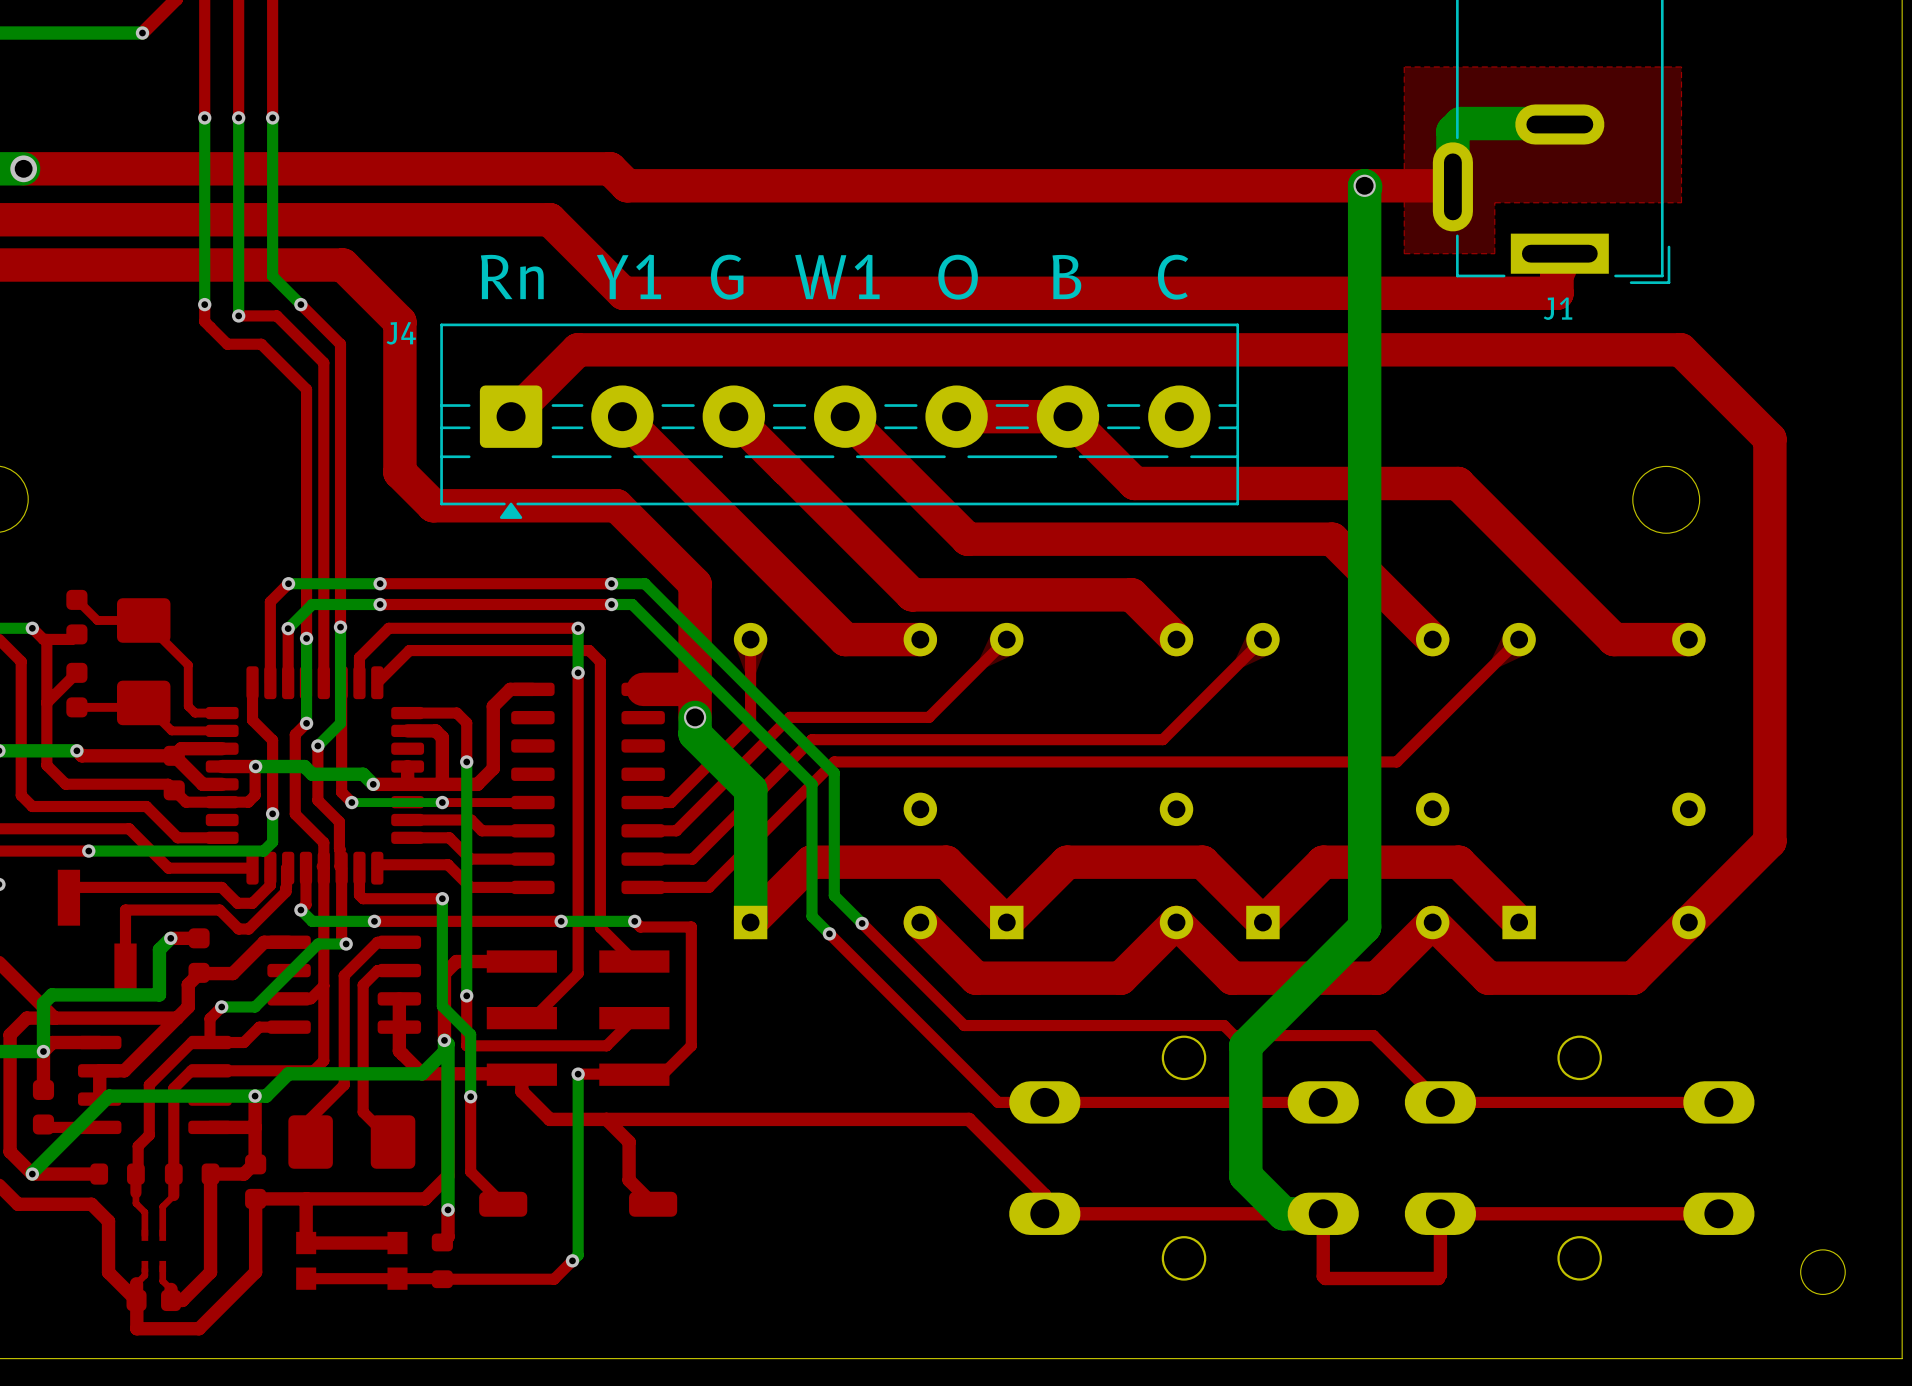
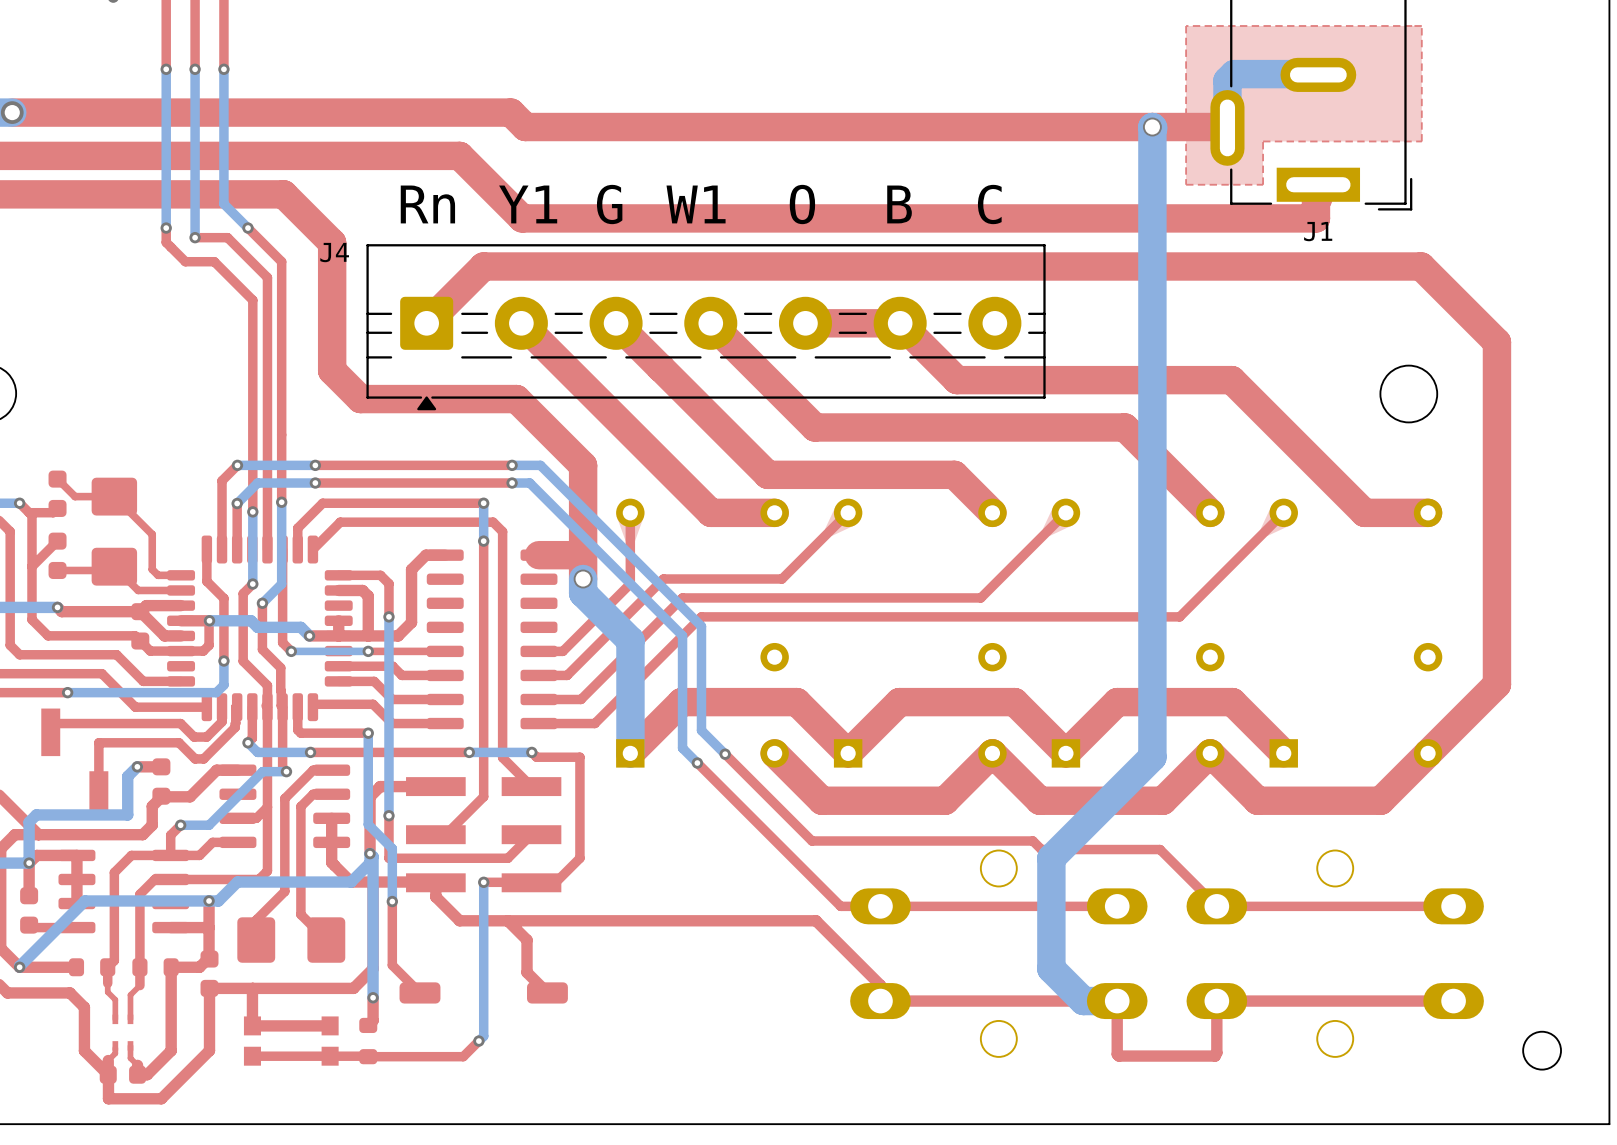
top track: (177, 1018) (124, 1070) (99, 1070) -> (76, 855) (76, 879)
top track: (191, 1042) (149, 1084) (149, 1135) (138, 1146) (138, 1171) -> (155, 855) (131, 855) (114, 872) (114, 960) (109, 965)

